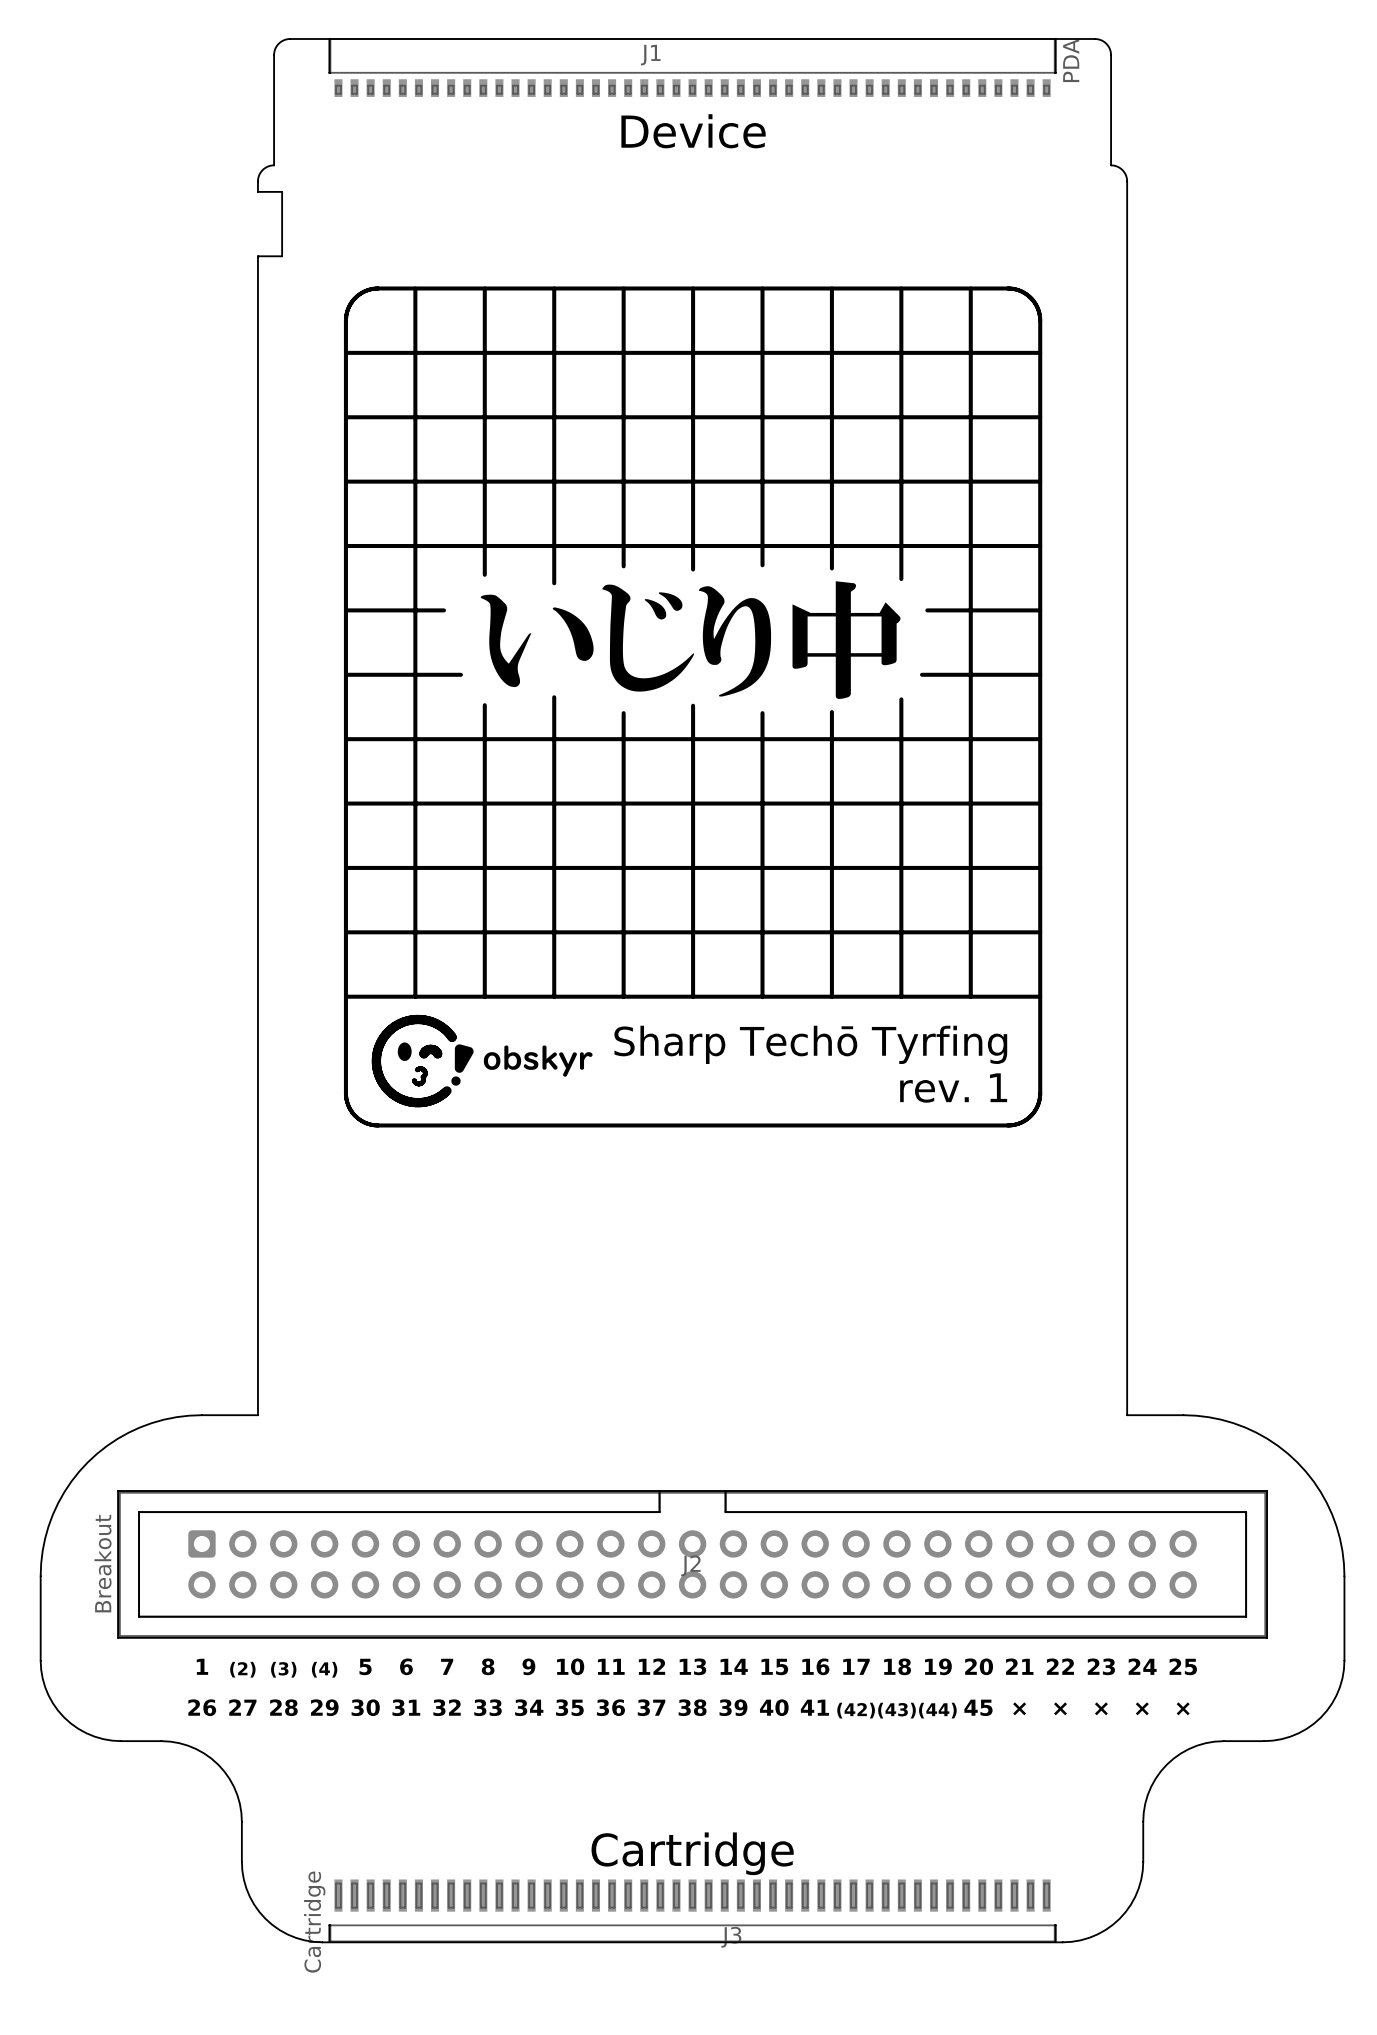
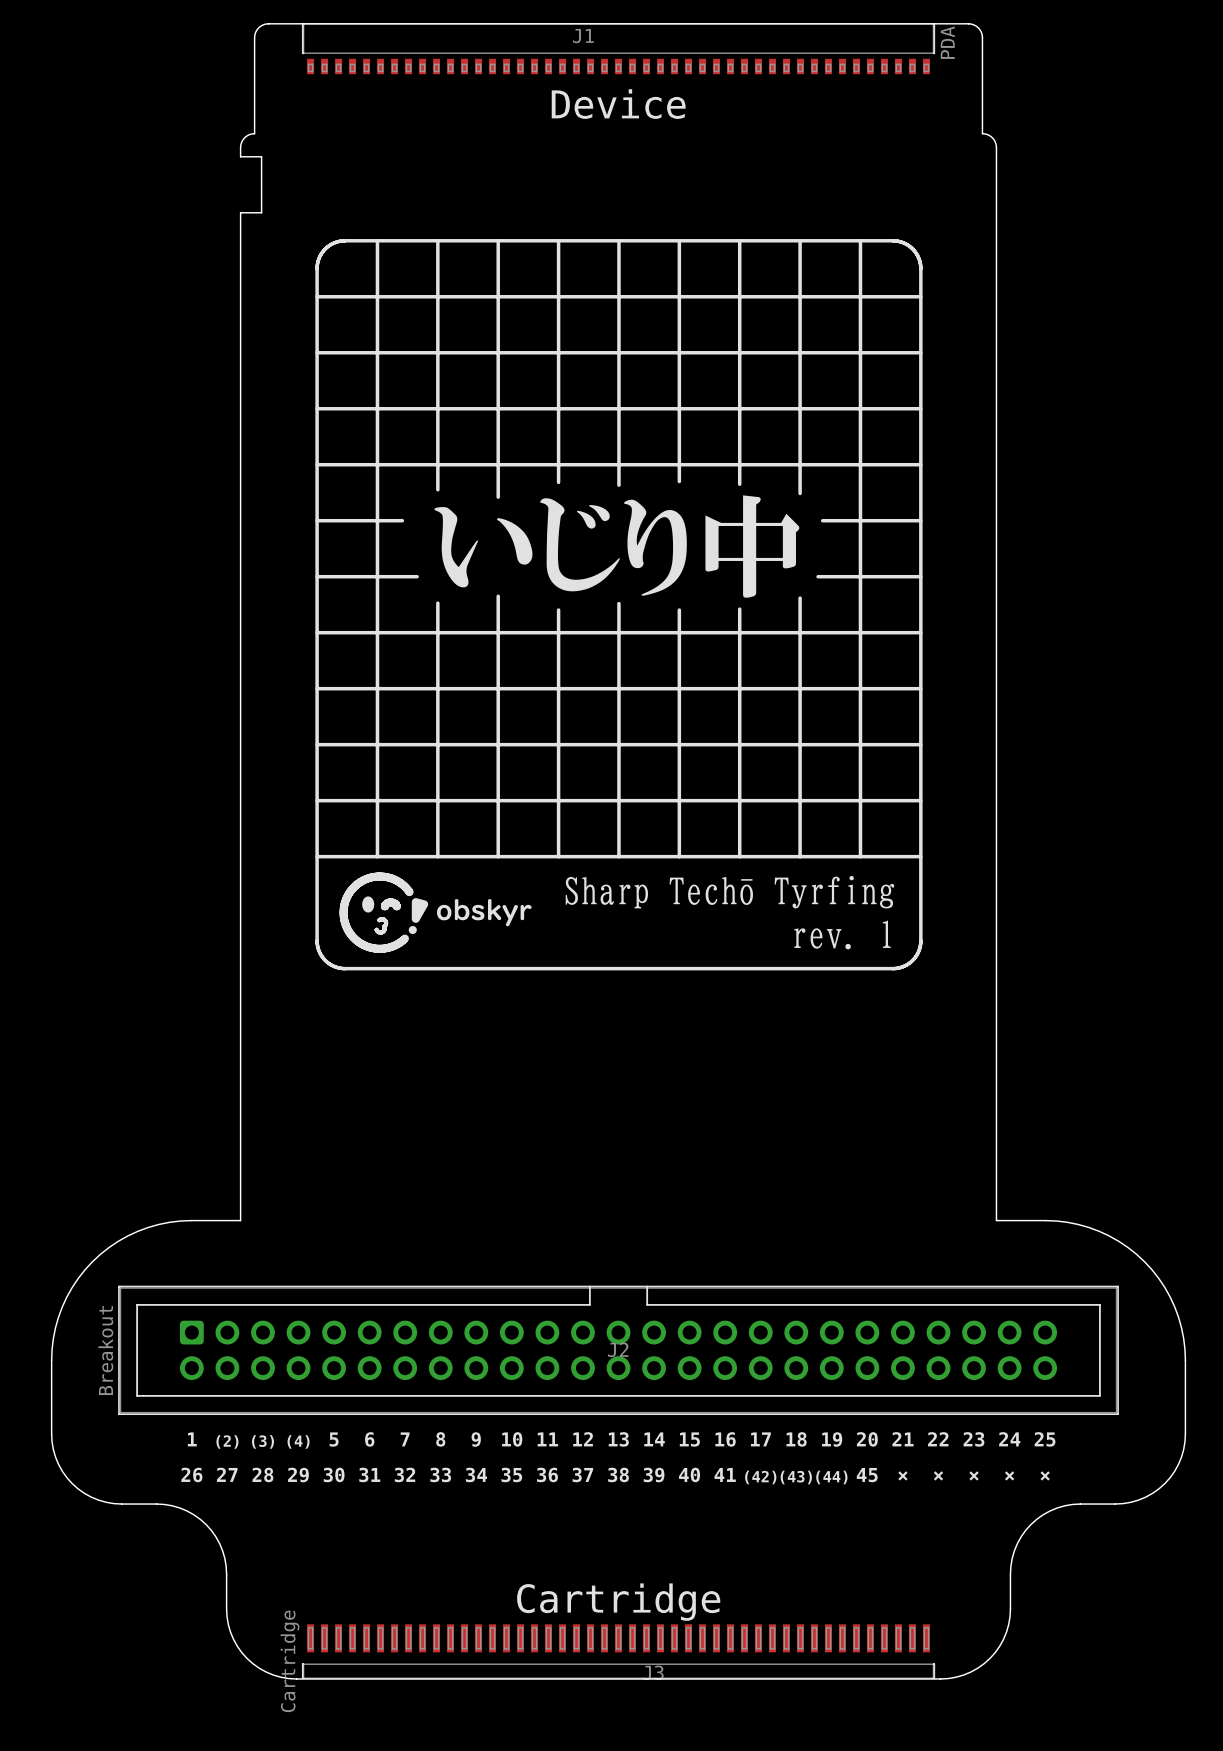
drawing: none -> [774, 875, 895, 948]
drawing: none -> [565, 876, 648, 909]
drawing: none -> [669, 876, 753, 905]
text: Sharp Techō Tyrfing (810, 1044) -> none
drawing: none -> [794, 928, 851, 950]
text: rev. 1 (953, 1088) -> none

